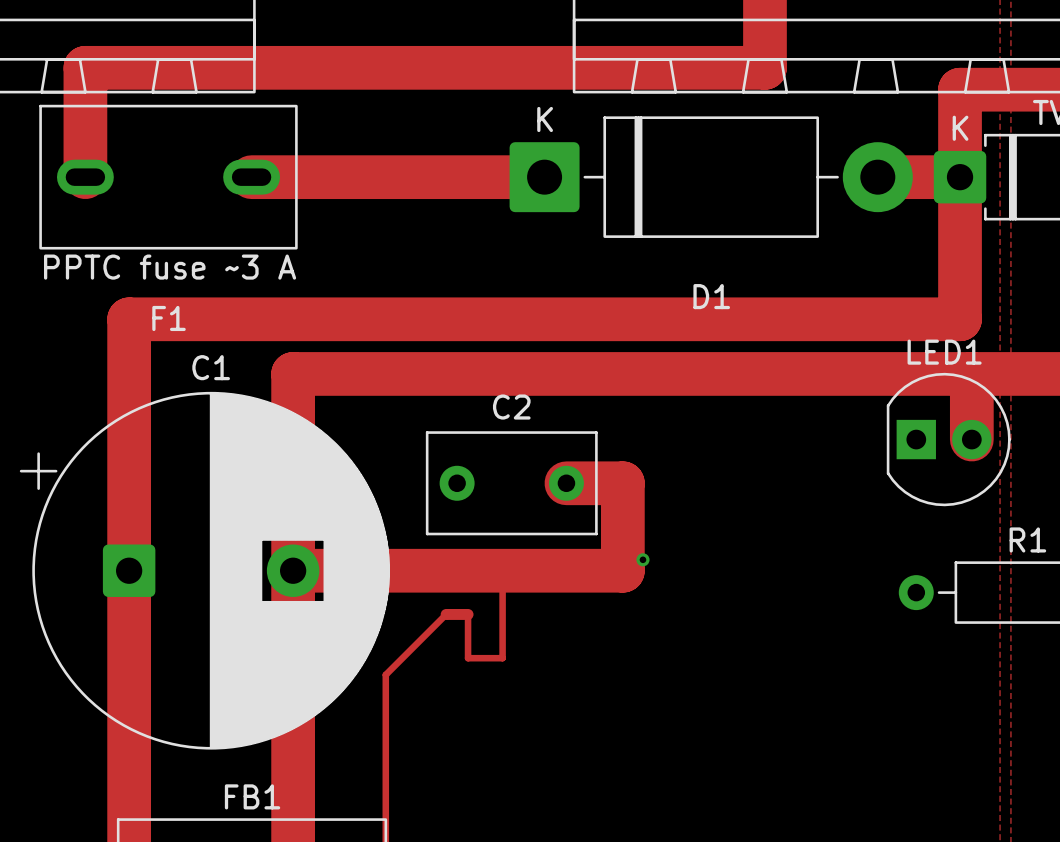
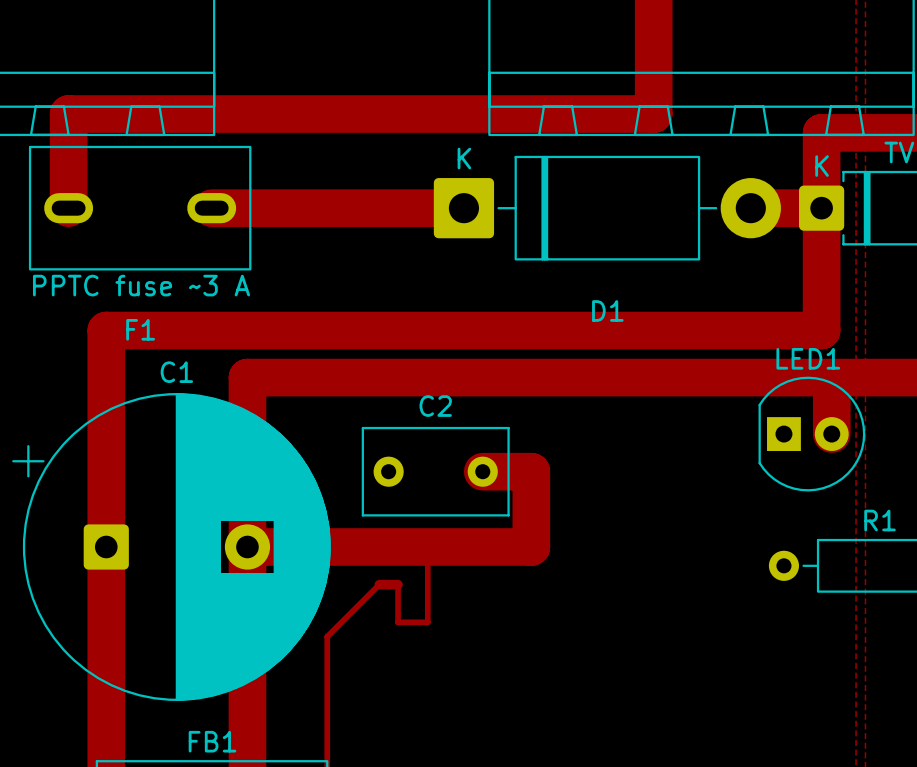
via: (642, 559) -> none

